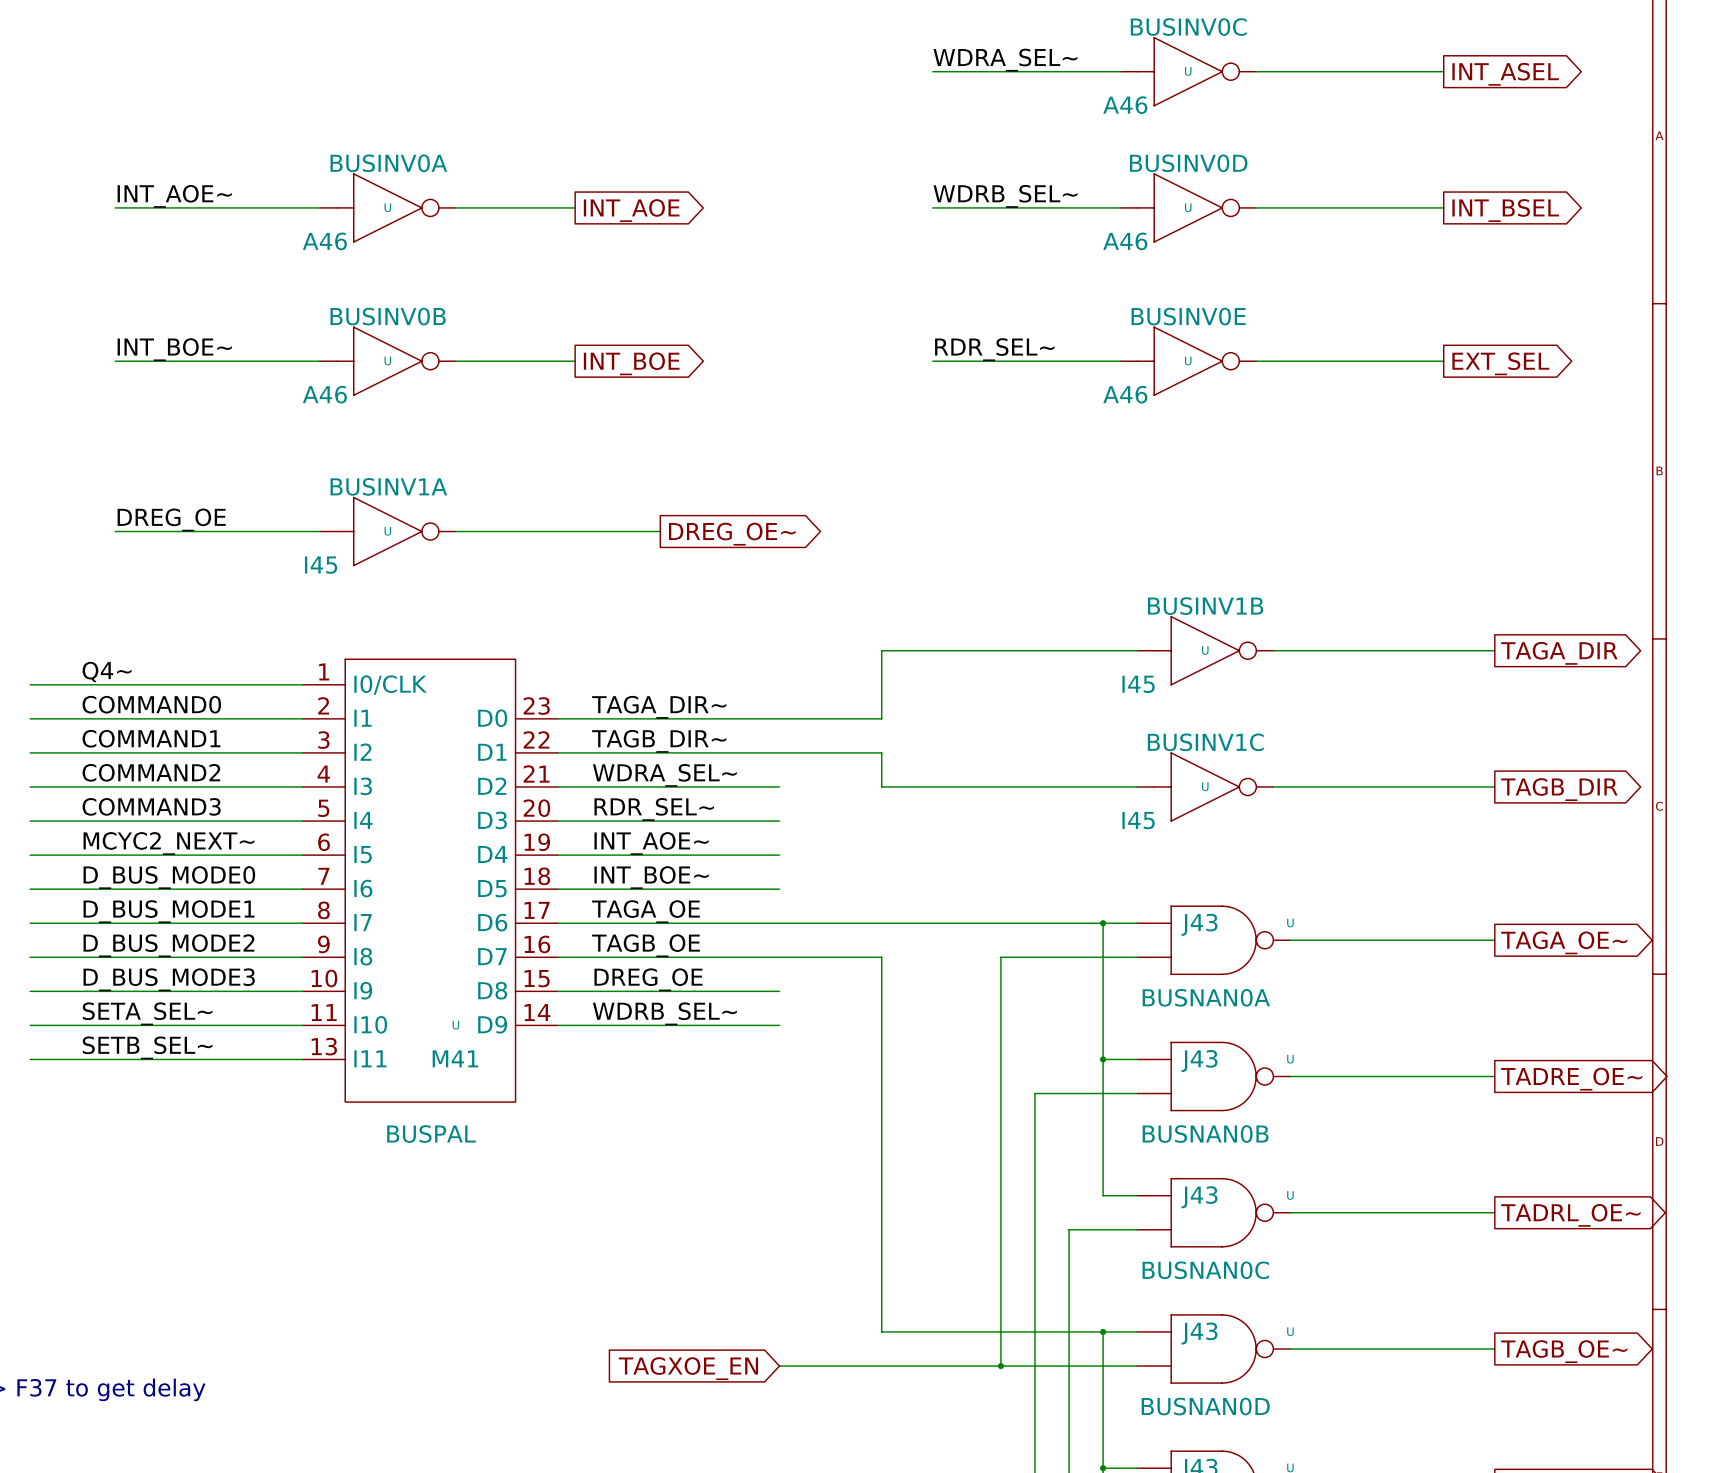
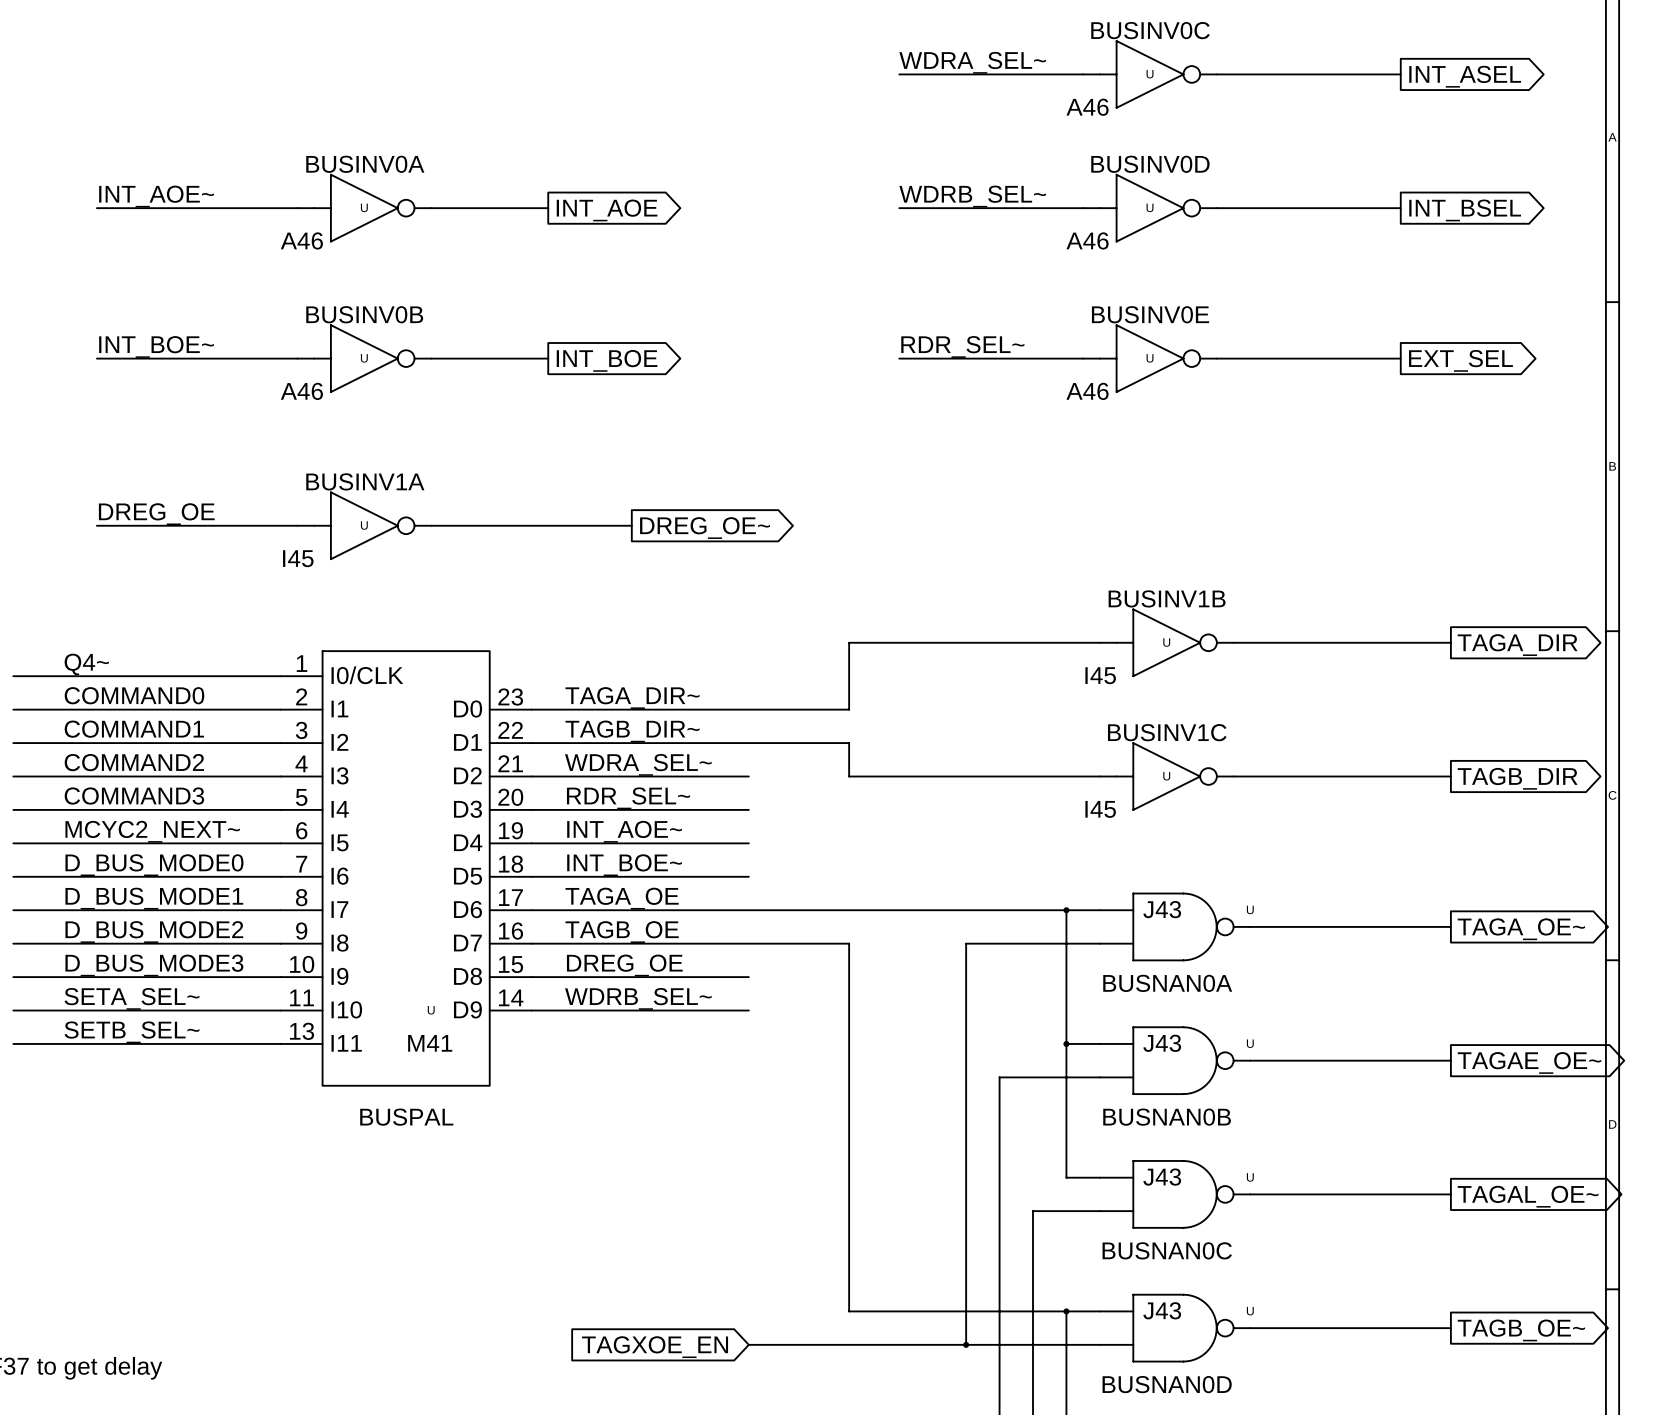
global label: TADRE_OE~ (1571, 1079) -> TAGAE_OE~ (1529, 1062)
global label: TADRL_OE~ (1570, 1215) -> TAGAL_OE~ (1528, 1196)

